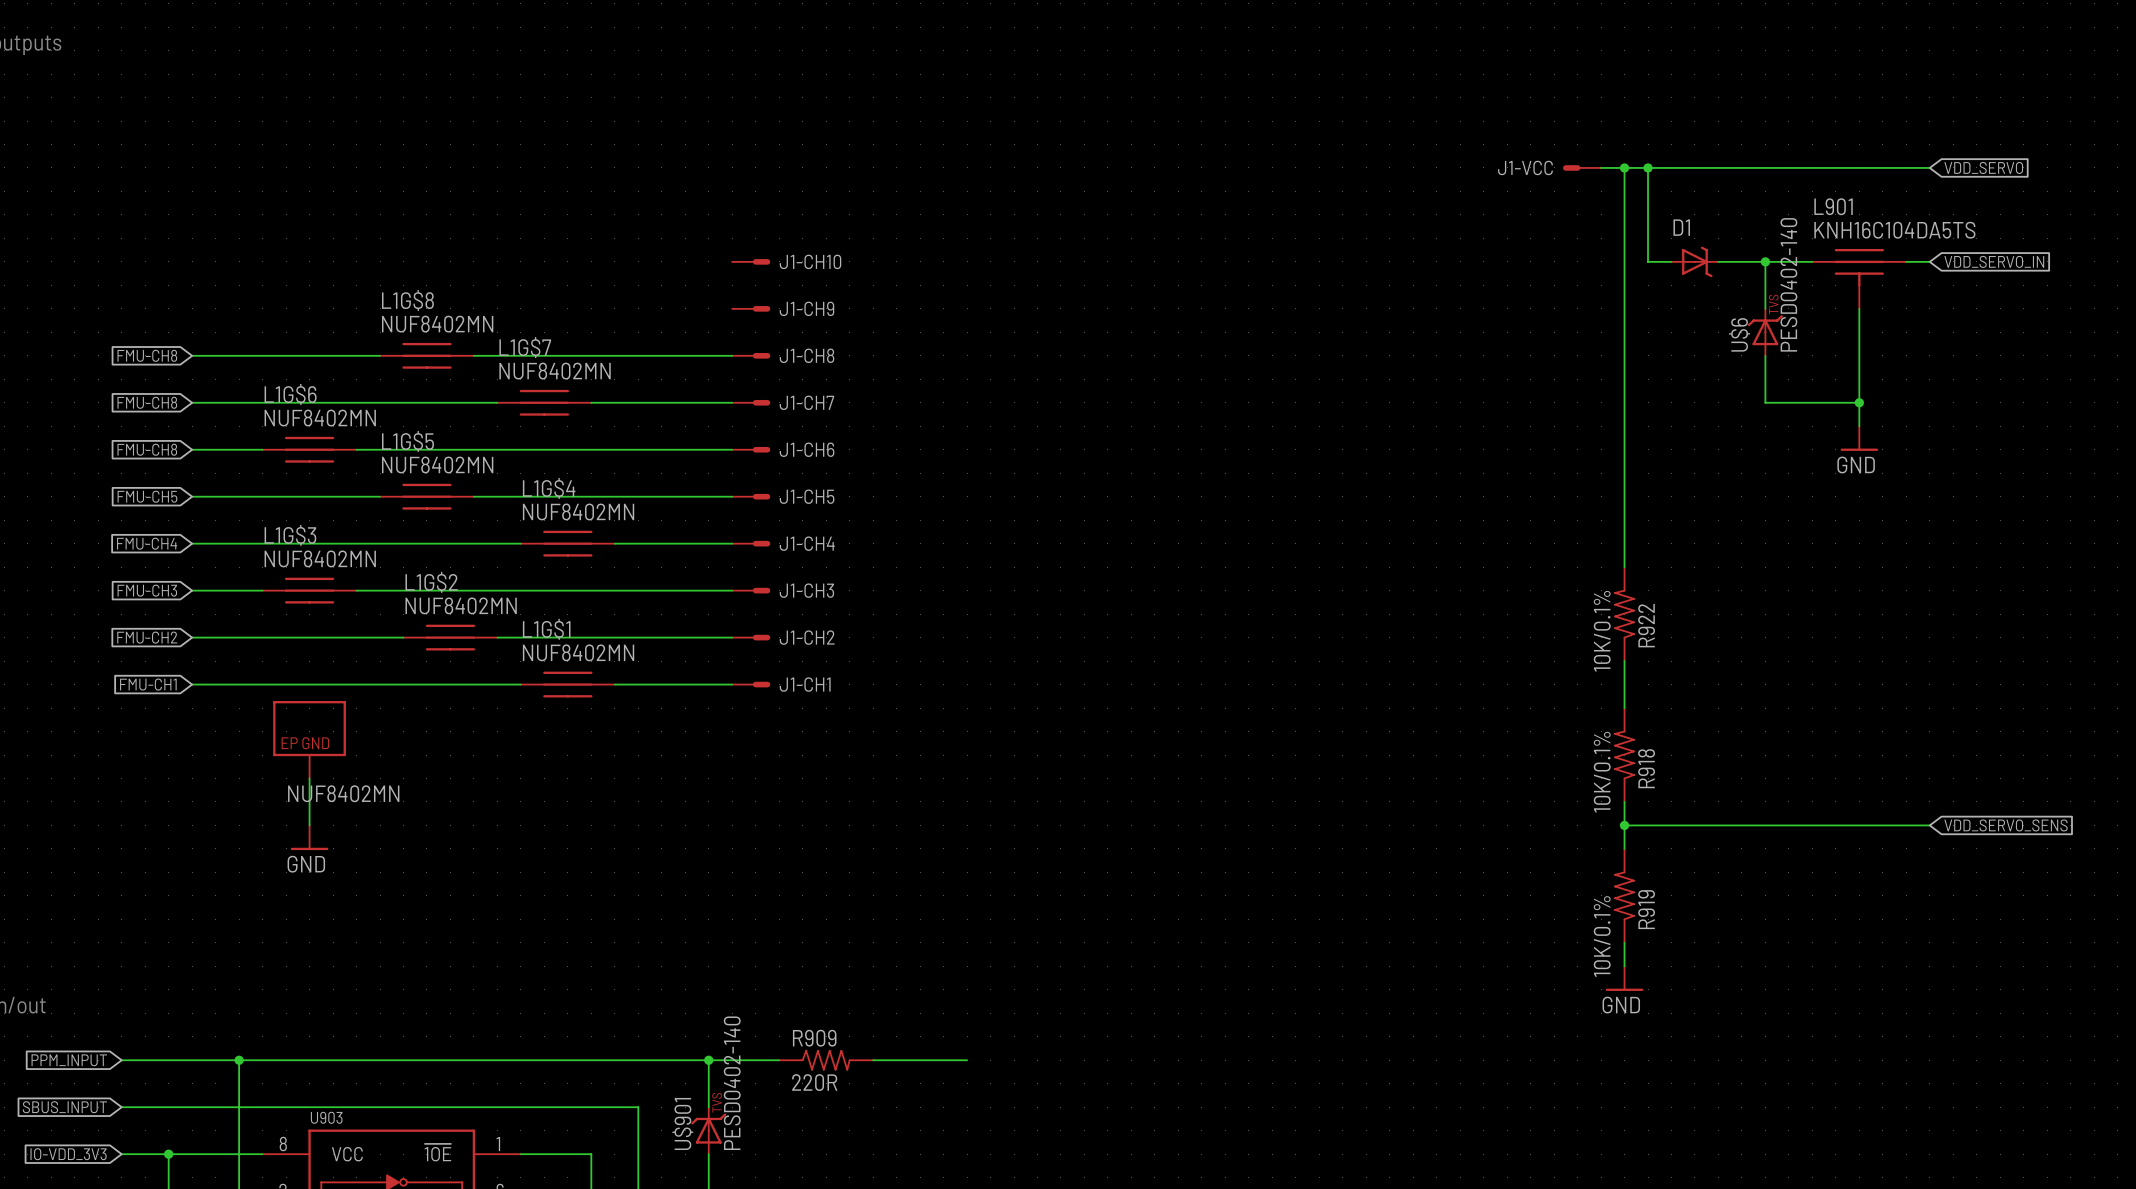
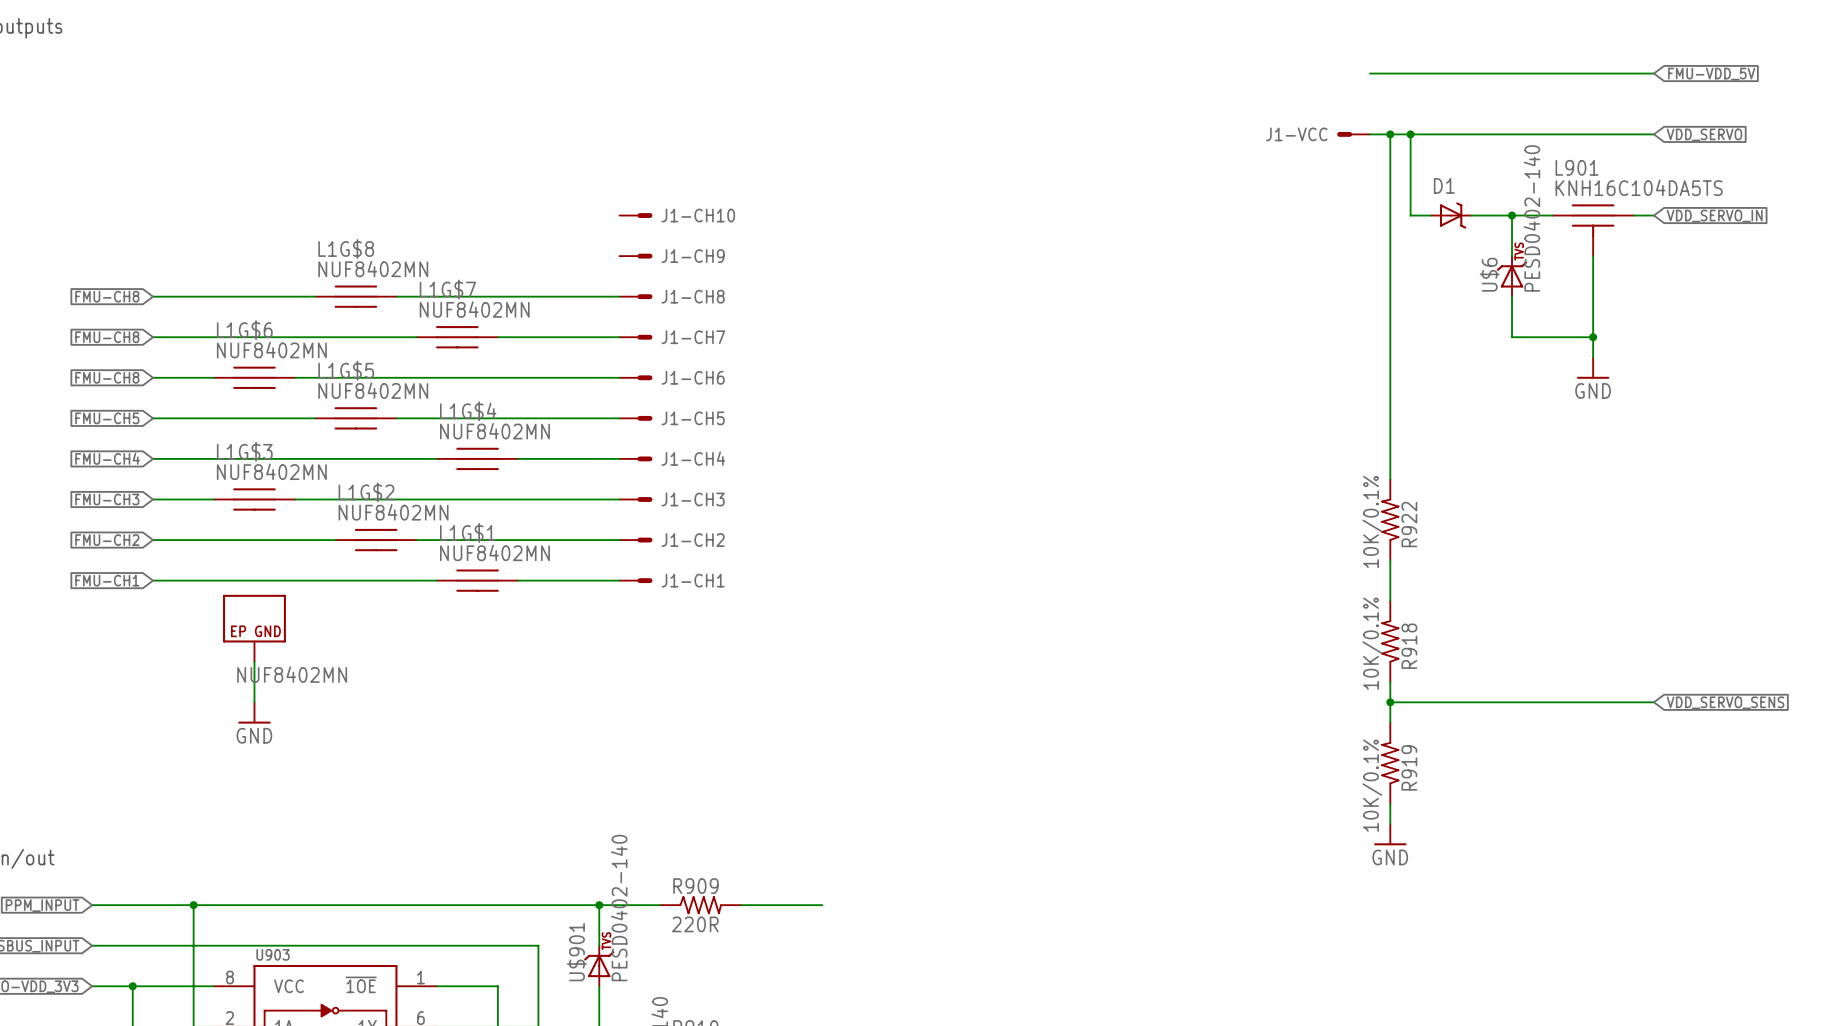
wire: none -> (1370, 73) (1653, 73)
global label: none -> FMU-VDD_5V (1711, 74)

